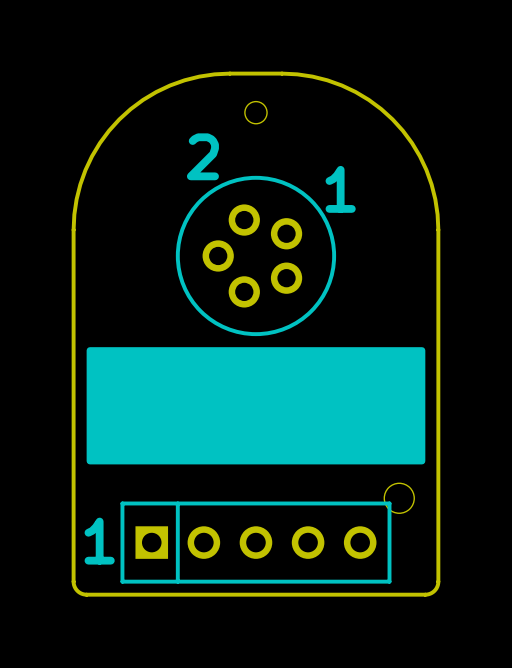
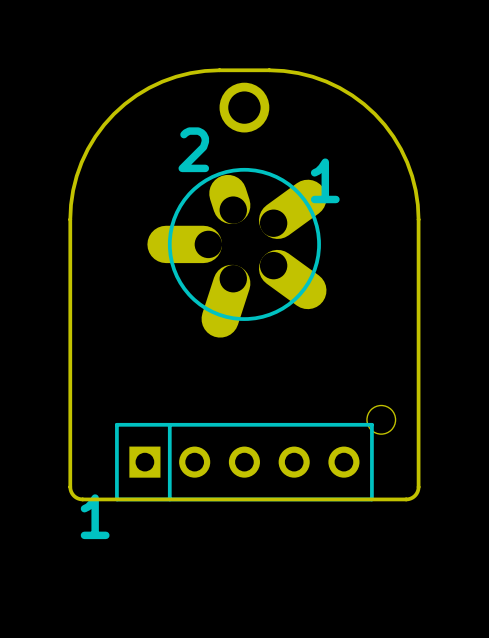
part footprint: [175, 101, 337, 337] -> [147, 82, 327, 338]
drawing: [86, 347, 426, 465] -> none
board edge: (73, 510) (73, 583) (78, 591) (86, 594) (428, 594) (434, 590) (438, 583) (438, 510) -> (70, 487) (73, 495) (82, 499) (406, 499) (414, 495) (418, 487)
part position: (267, 533) -> (255, 453)

